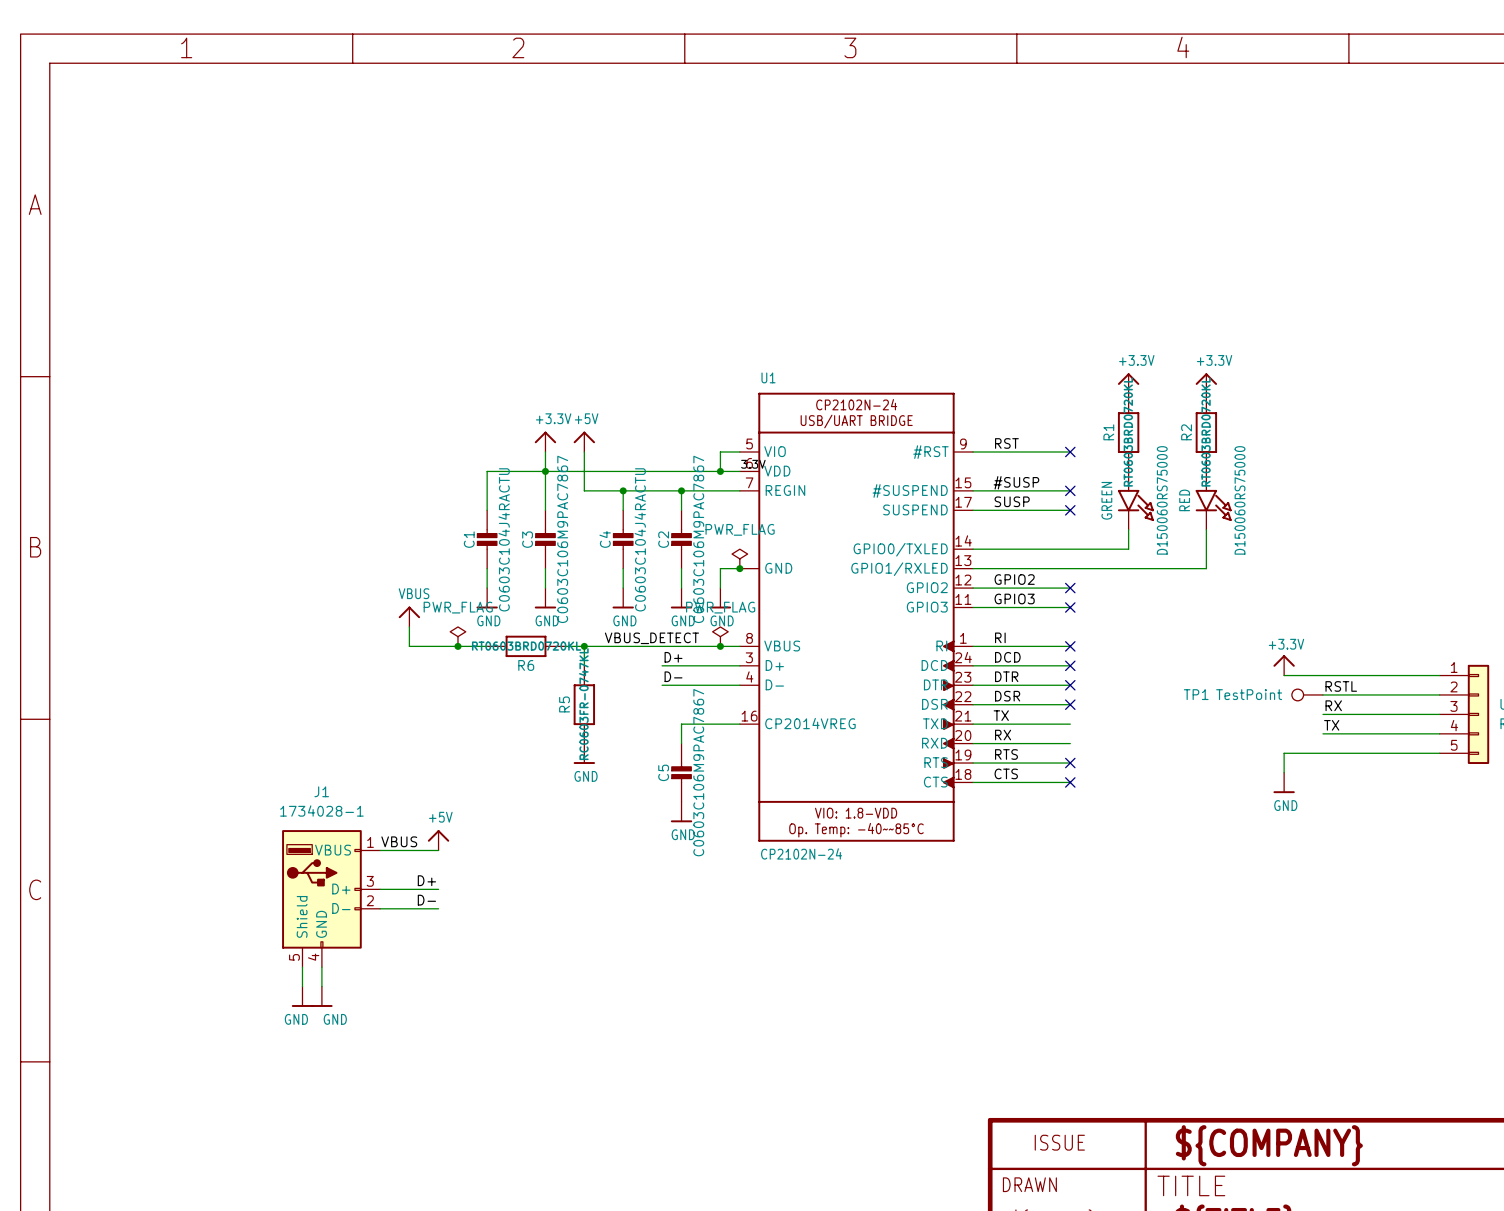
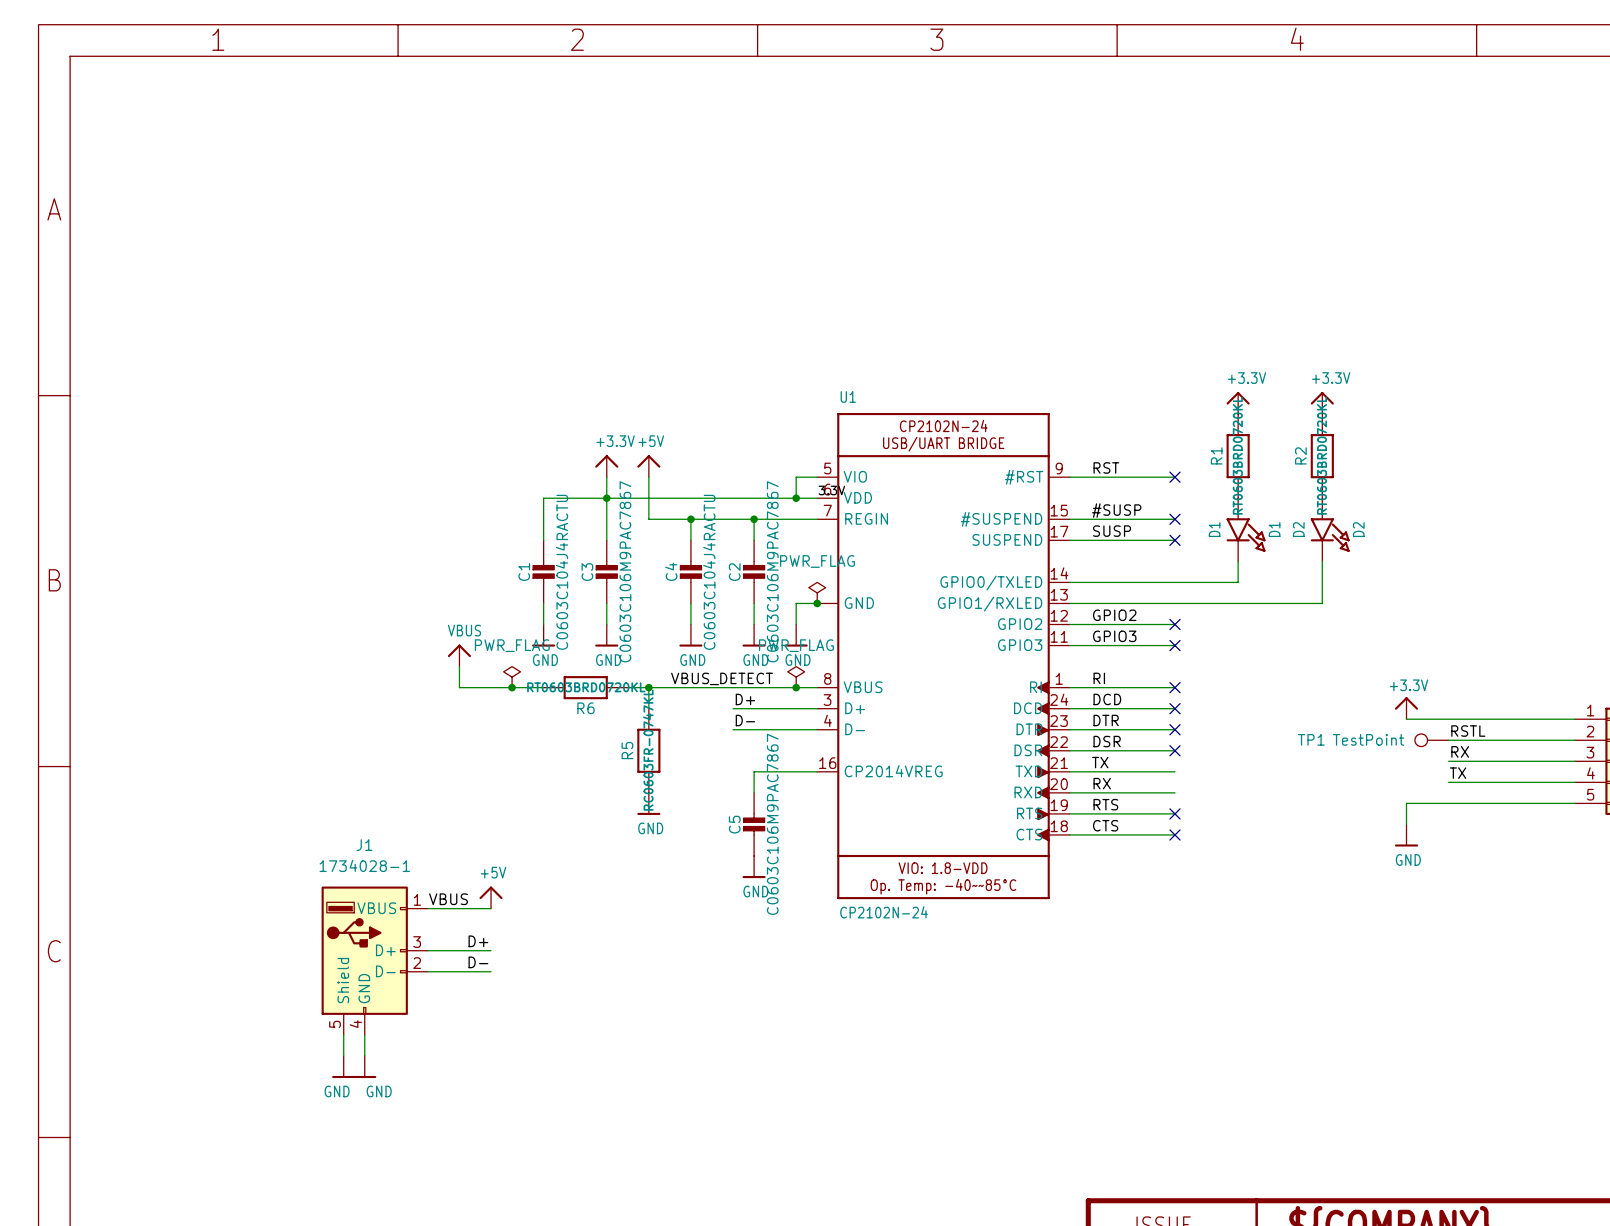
D150060RS75000 value: GREEN (1106, 500) -> D1 (1214, 529)
D150060RS75000 name: D150060RS75000 (1162, 500) -> D1 (1274, 529)
D150060RS75000 value: RED (1184, 500) -> D2 (1298, 529)
D150060RS75000 name: D150060RS75000 (1240, 500) -> D2 (1358, 529)

